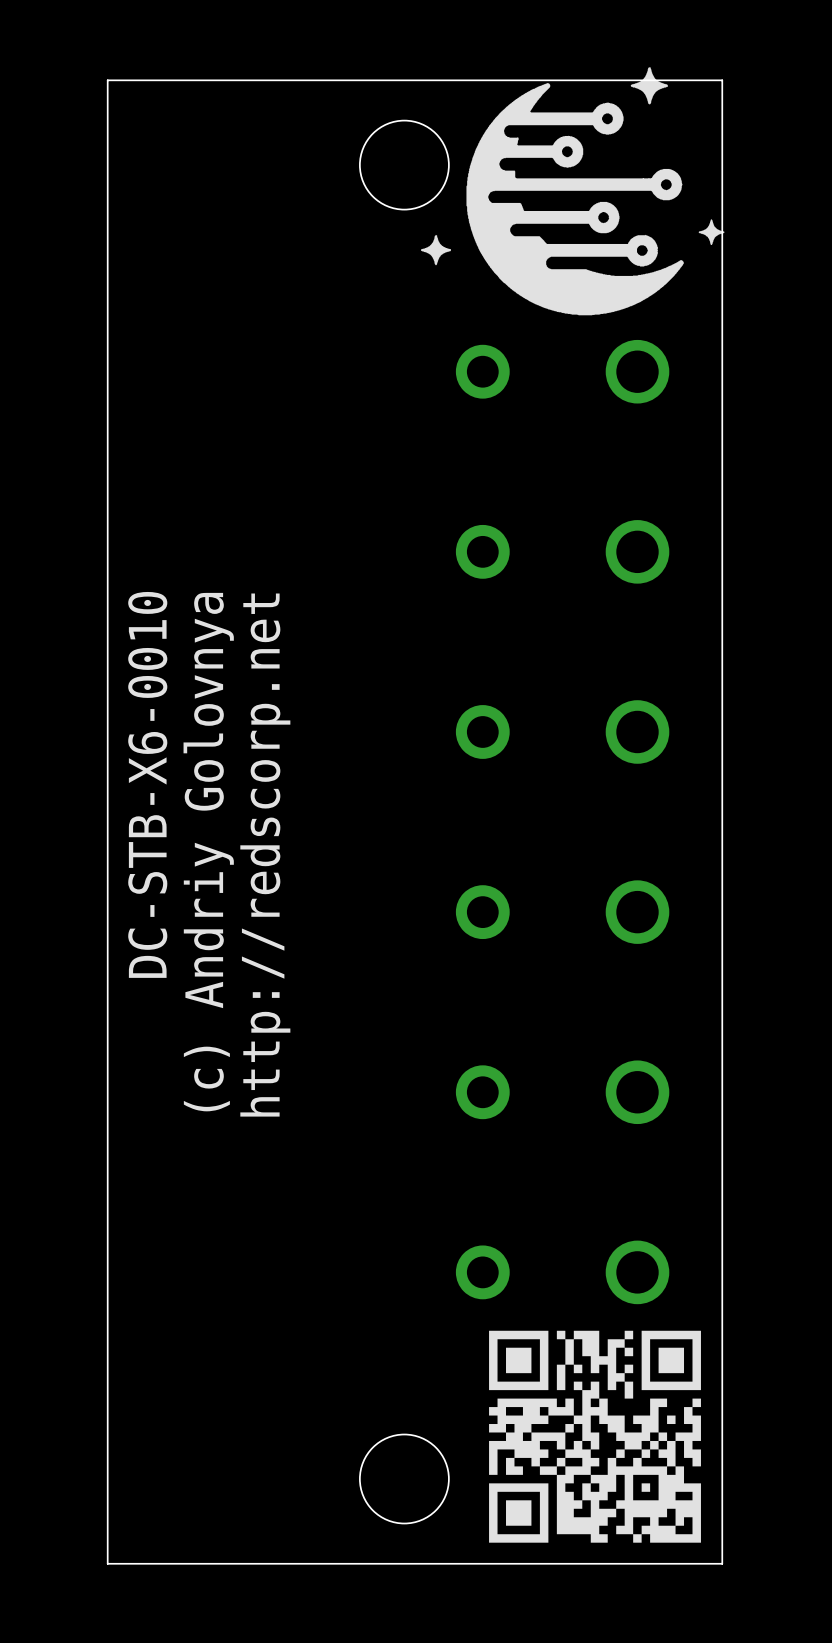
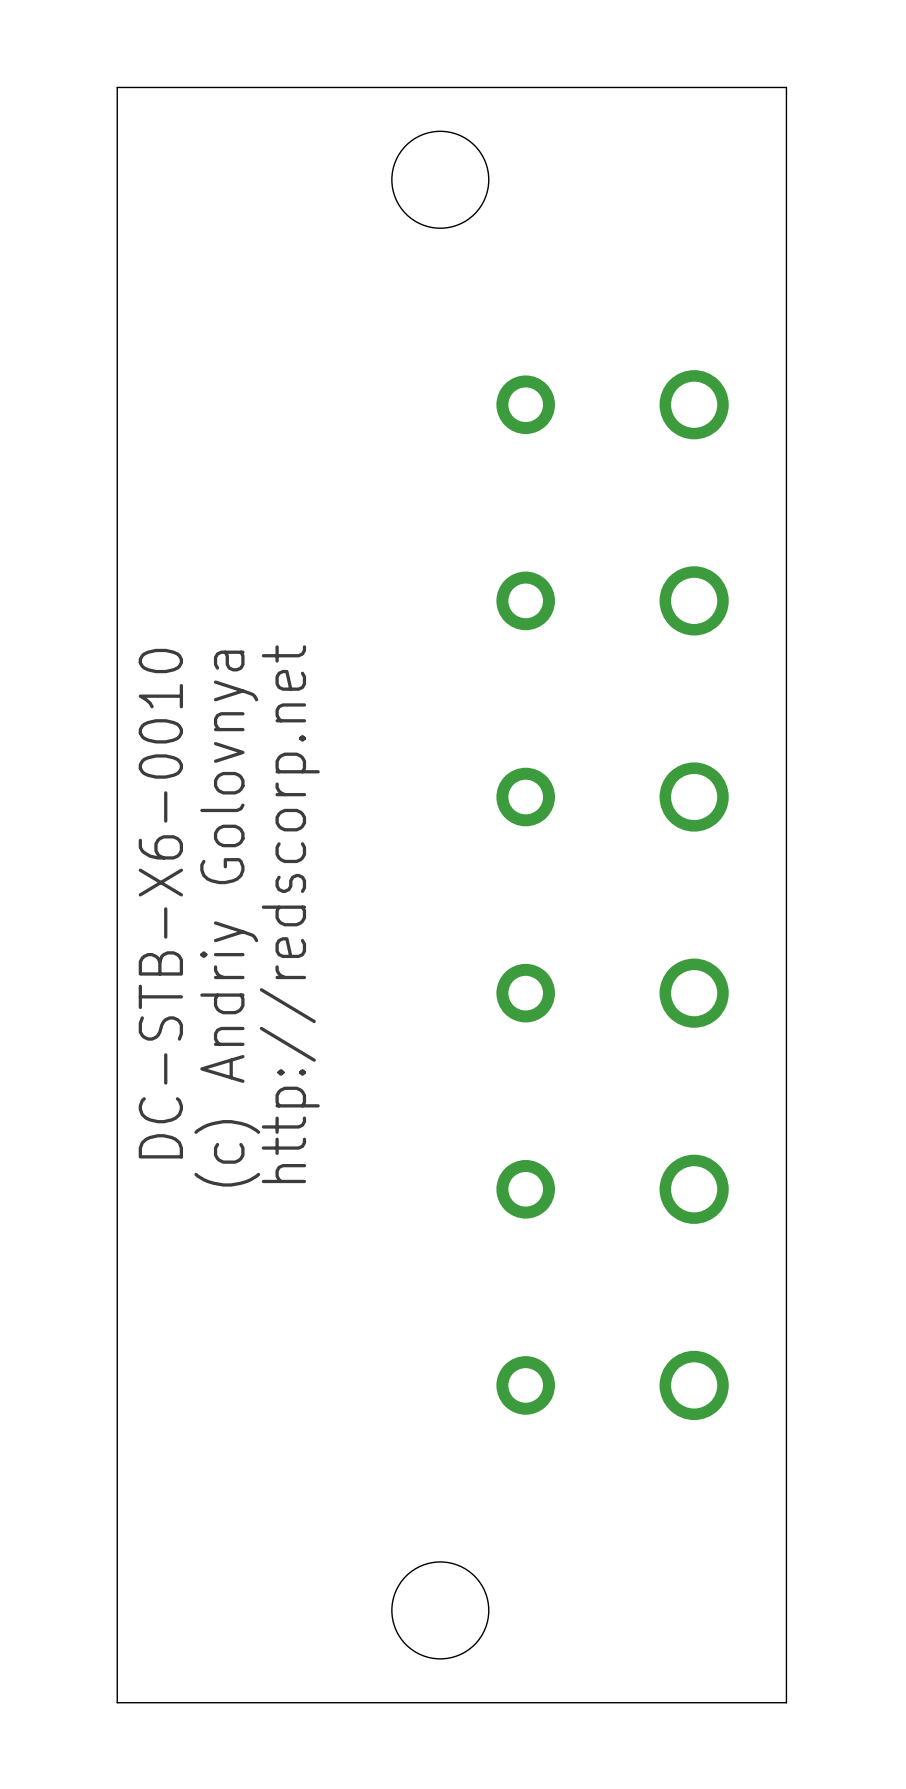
drawing: [421, 67, 725, 316] -> none
drawing: [489, 1330, 701, 1543] -> none

